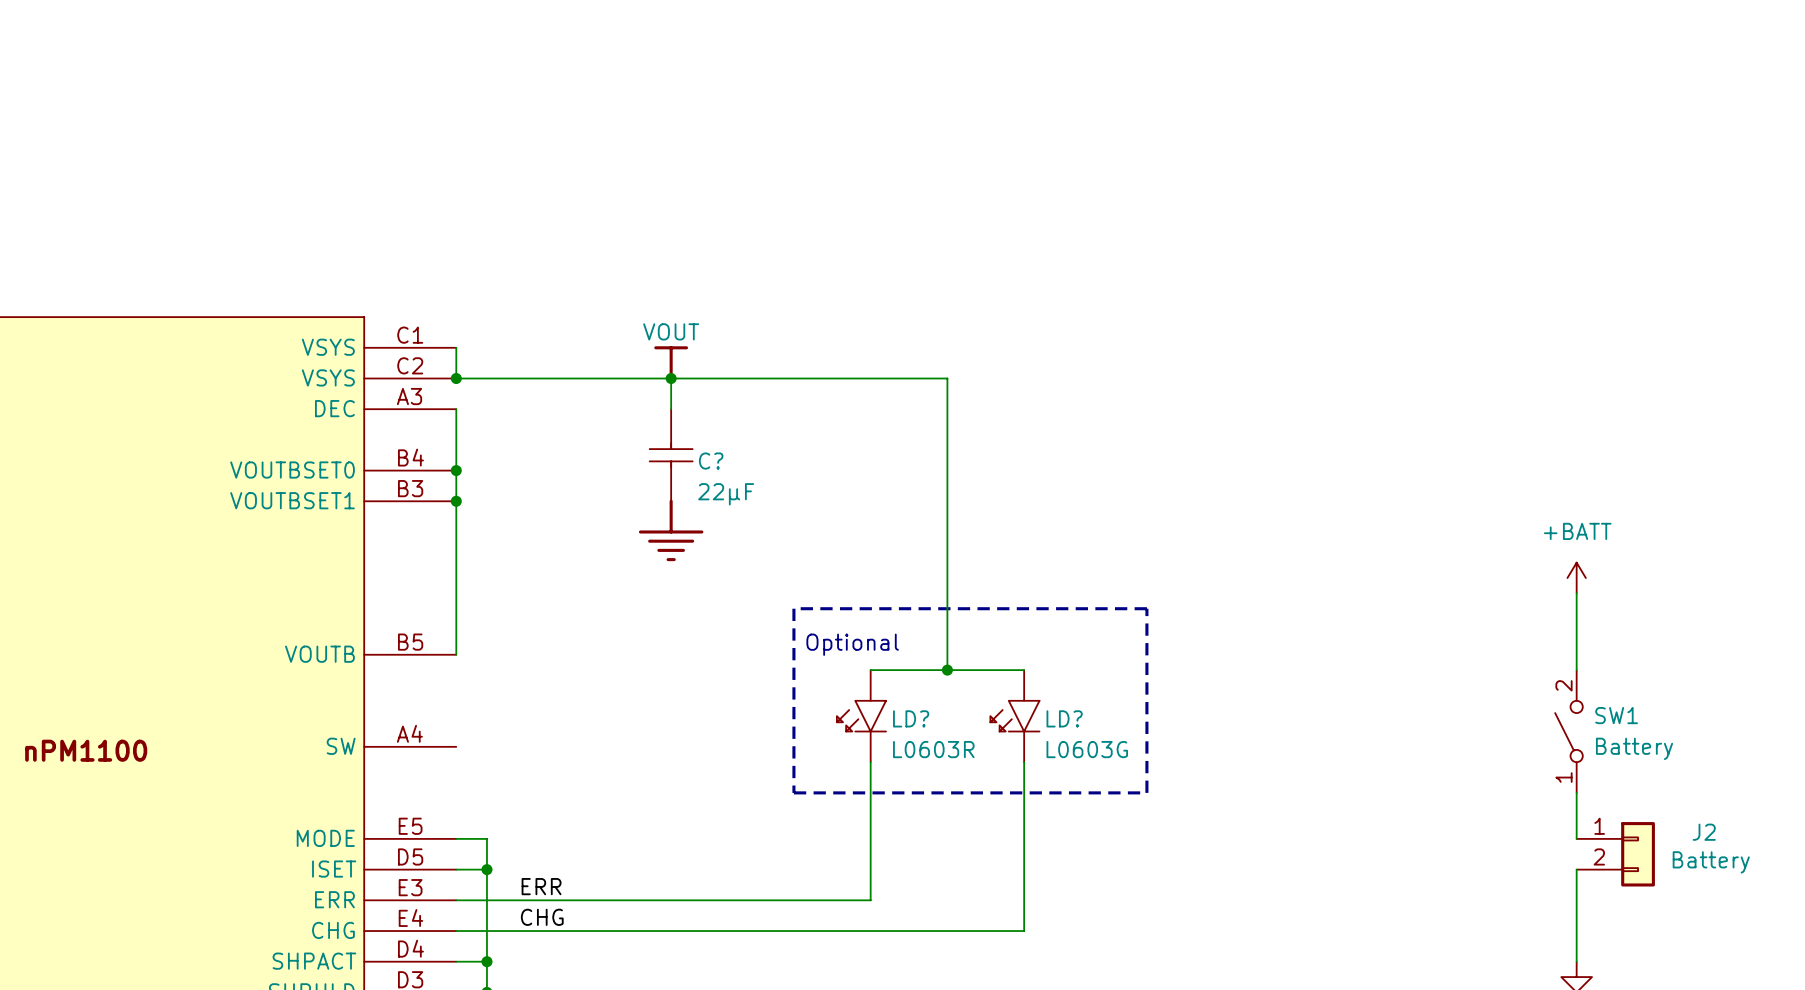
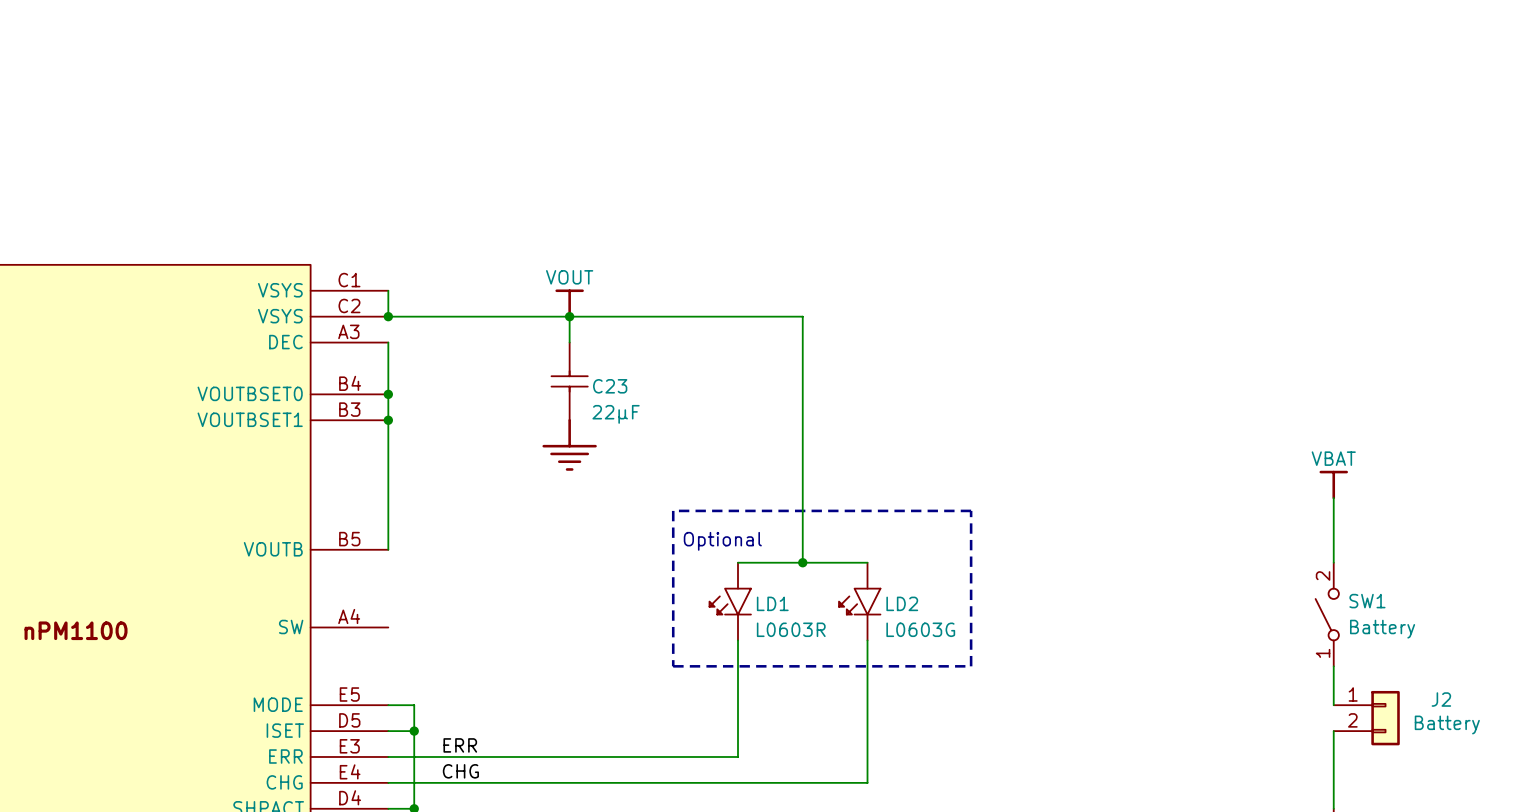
C? name: C? (711, 461) -> C23 (610, 386)
power symbol: +BATT (1576, 578) -> VBAT (1333, 485)
LD? name: LD? (911, 718) -> LD1 (772, 603)
LD? name: LD? (1064, 718) -> LD2 (902, 603)

